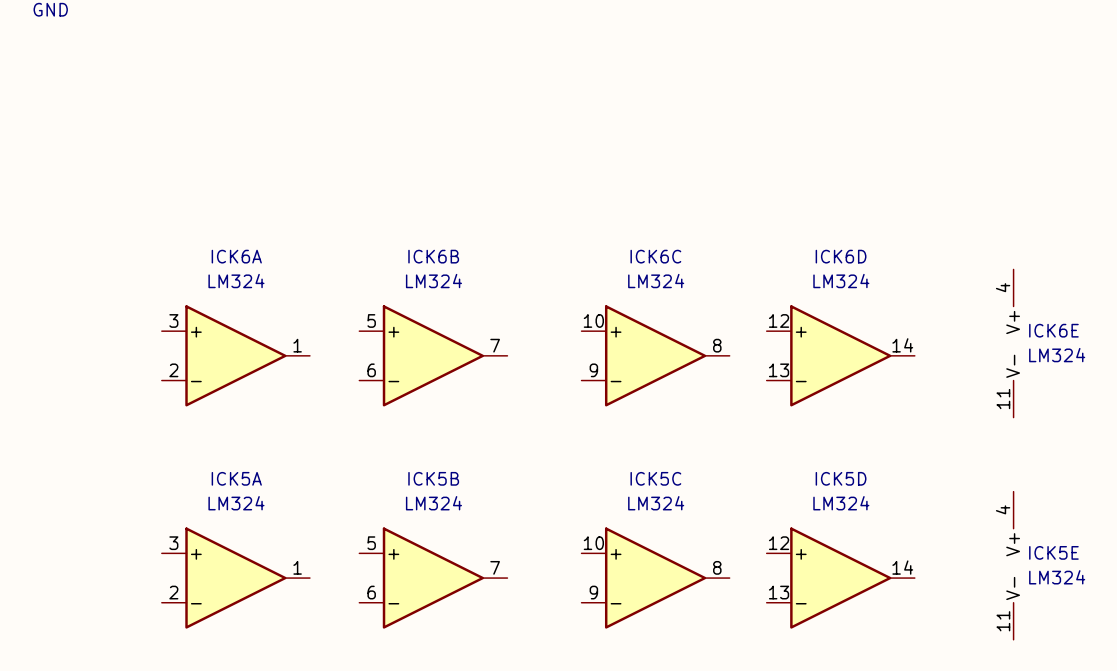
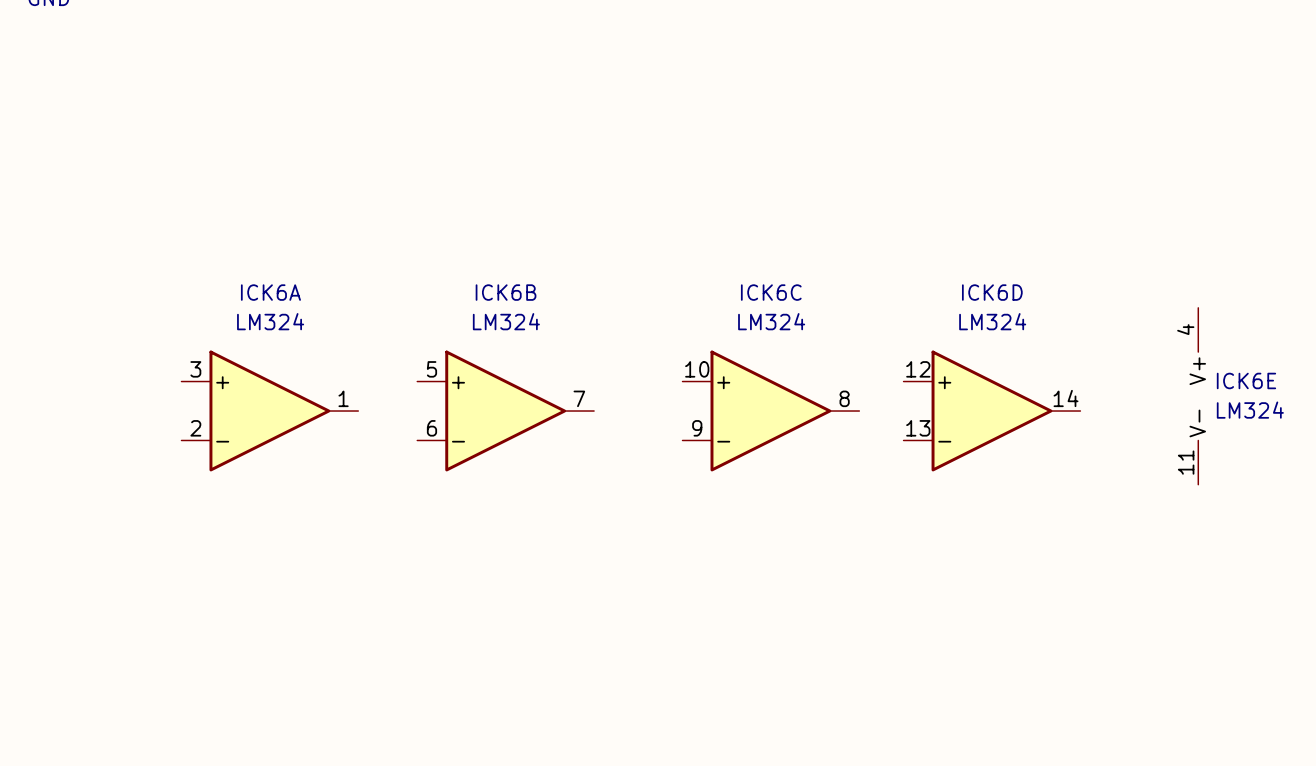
ICK5E: LM324 (1013, 565) -> none
ICK5A: LM324 (235, 578) -> none
ICK5B: LM324 (433, 578) -> none
ICK5C: LM324 (655, 578) -> none
ICK5D: LM324 (840, 578) -> none

